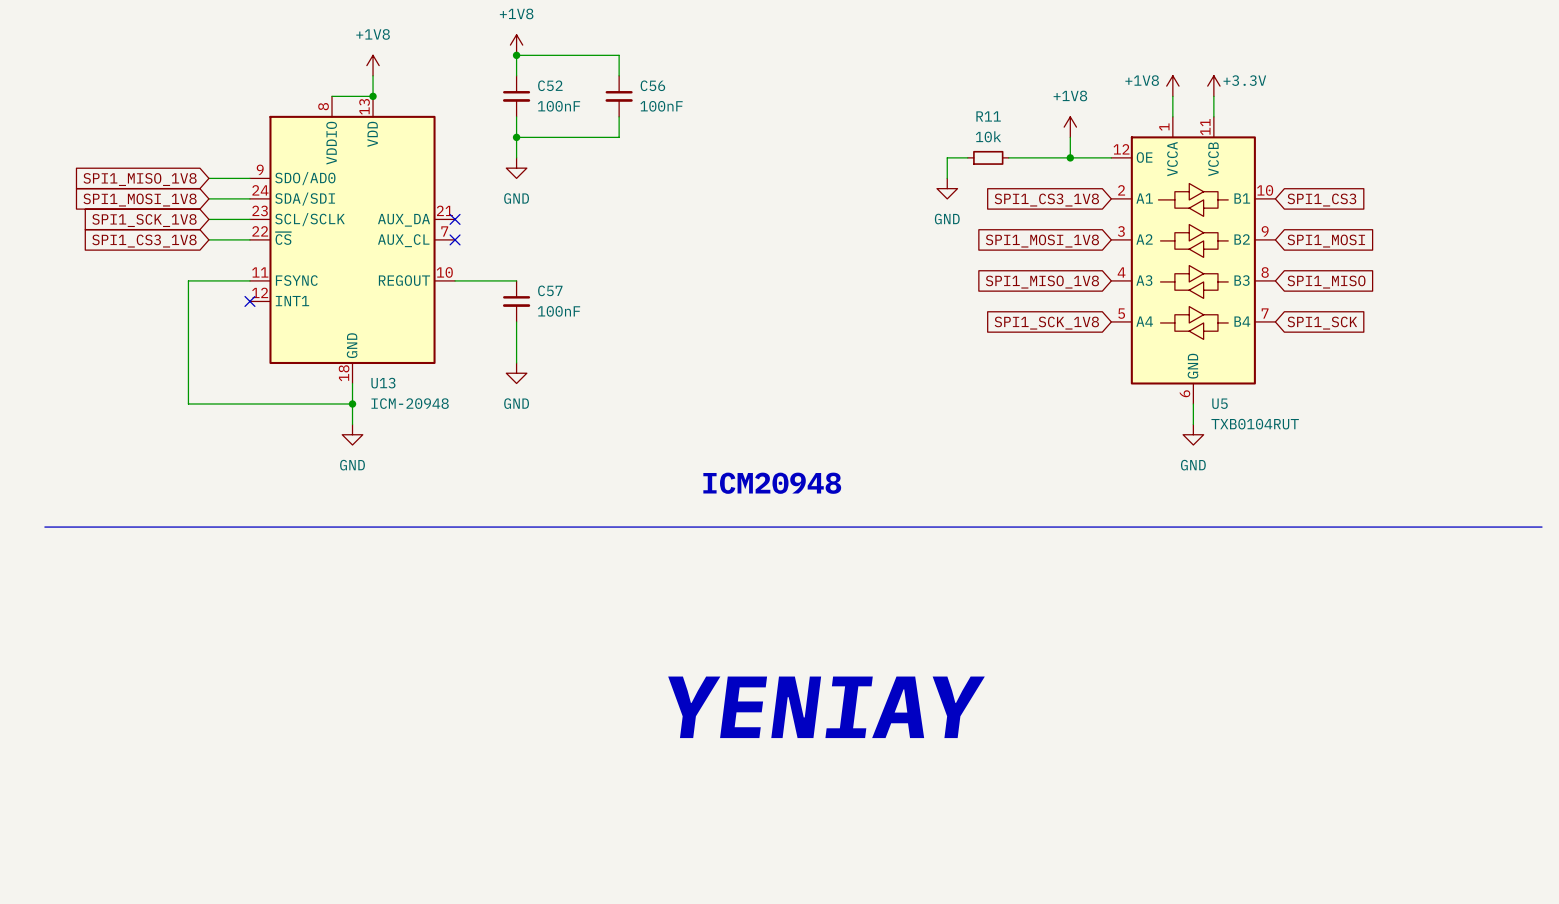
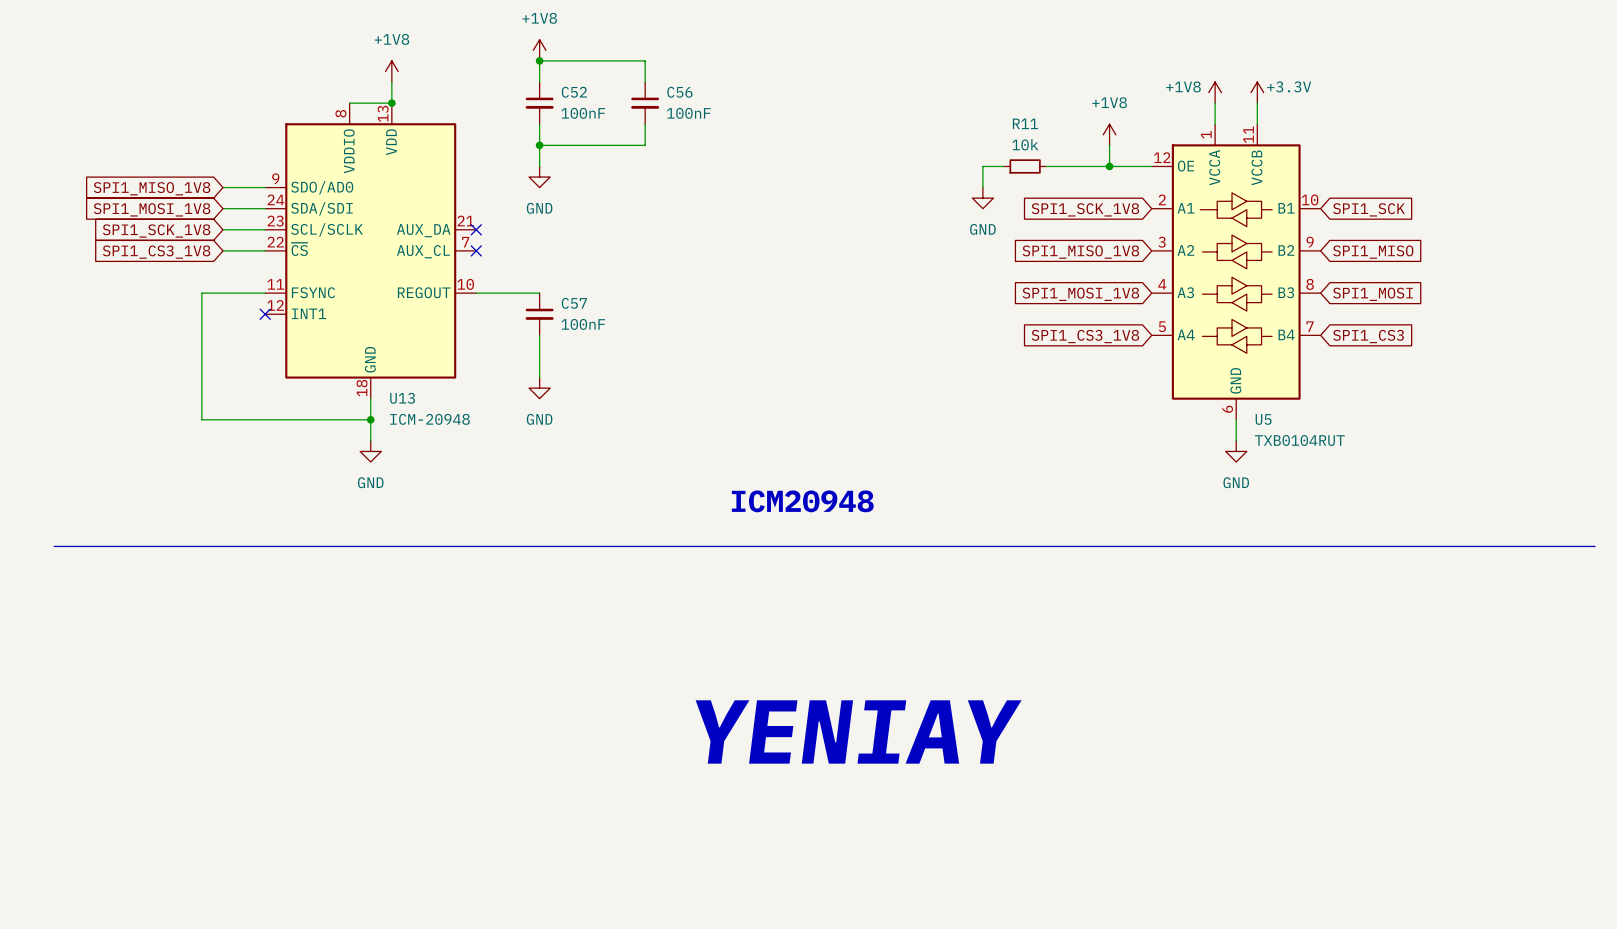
global label: SPI1_CS3_1V8 (1046, 200) -> SPI1_SCK_1V8 (1085, 209)
global label: SPI1_CS3 (1321, 200) -> SPI1_SCK (1369, 209)
global label: SPI1_MOSI_1V8 (1042, 241) -> SPI1_MISO_1V8 (1080, 252)
global label: SPI1_MOSI (1326, 241) -> SPI1_MISO (1373, 252)
global label: SPI1_MISO_1V8 (1042, 282) -> SPI1_MOSI_1V8 (1080, 294)
global label: SPI1_MISO (1326, 282) -> SPI1_MOSI (1373, 294)
global label: SPI1_SCK_1V8 (1046, 323) -> SPI1_CS3_1V8 (1085, 336)
global label: SPI1_SCK (1322, 323) -> SPI1_CS3 (1368, 336)

